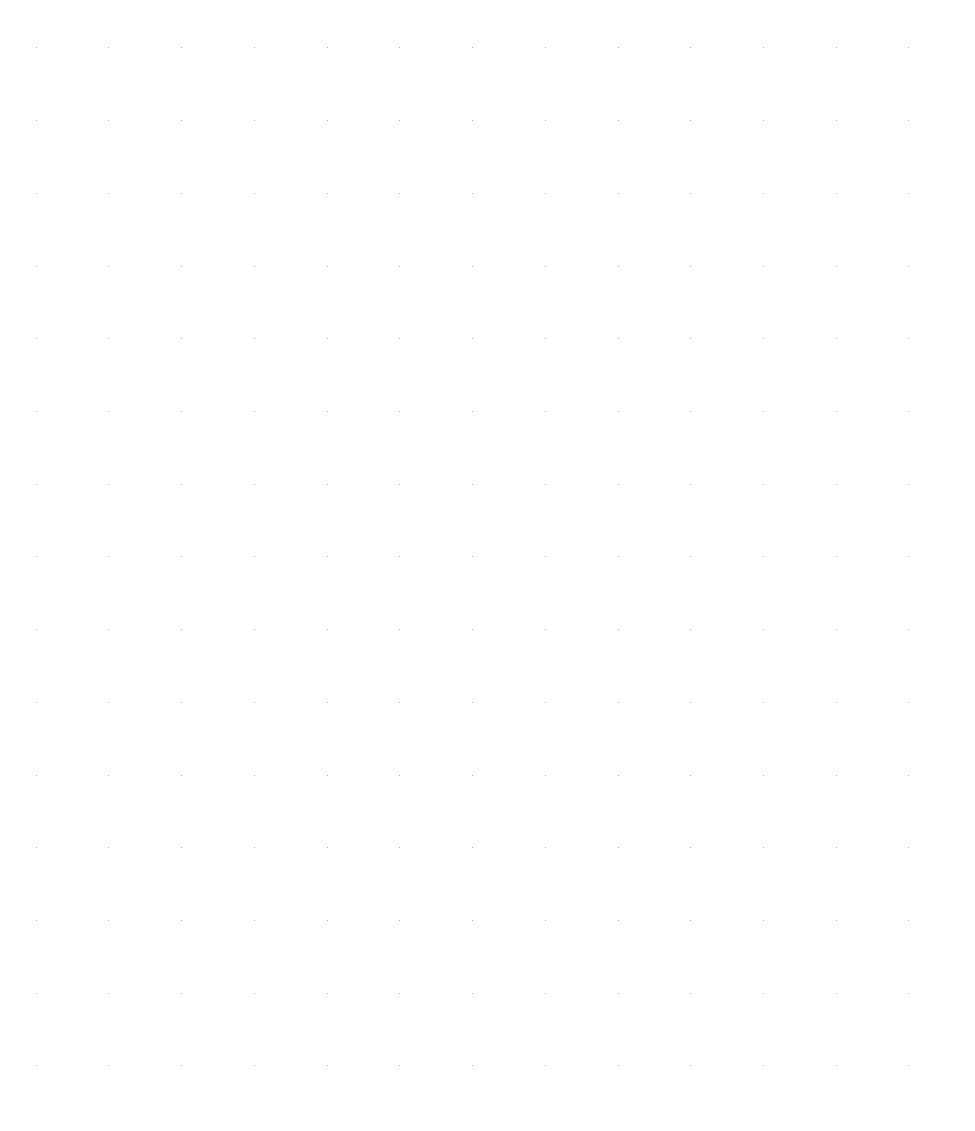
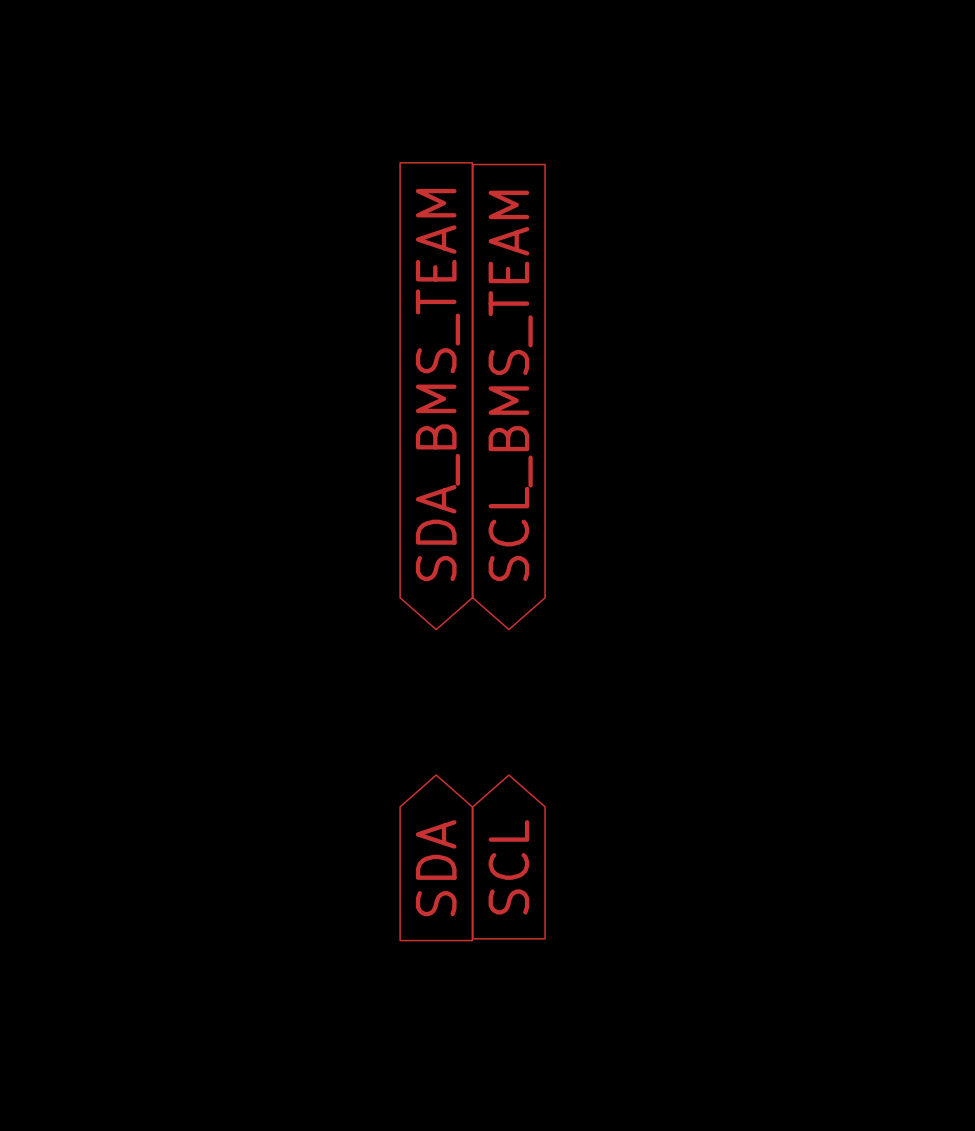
global label: none -> SDA_BMS_TEAM (437, 384)
global label: none -> SCL_BMS_TEAM (510, 385)
global label: none -> SCL (508, 867)
global label: none -> SDA (436, 868)

